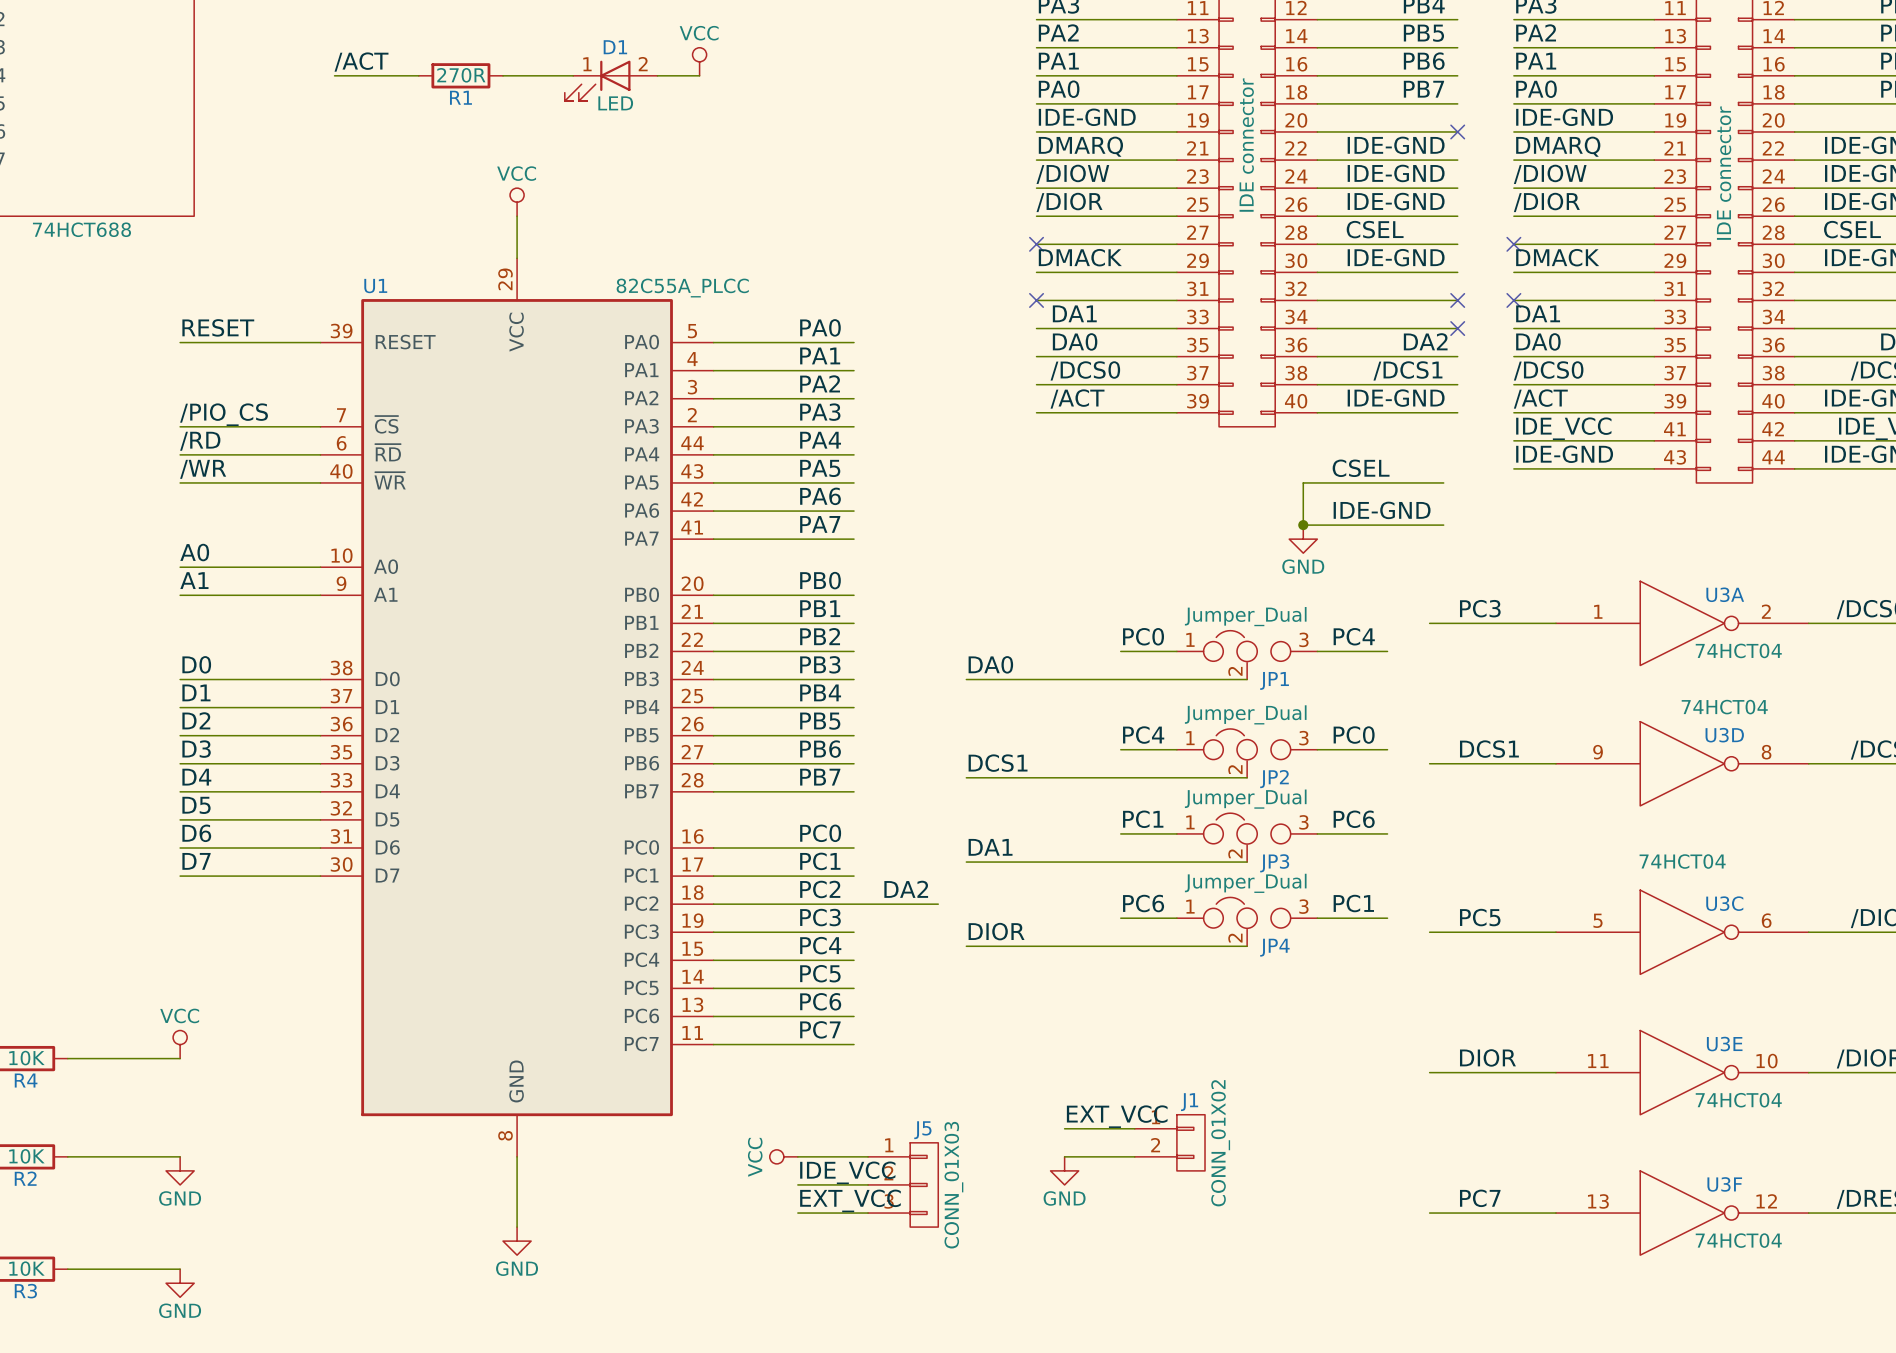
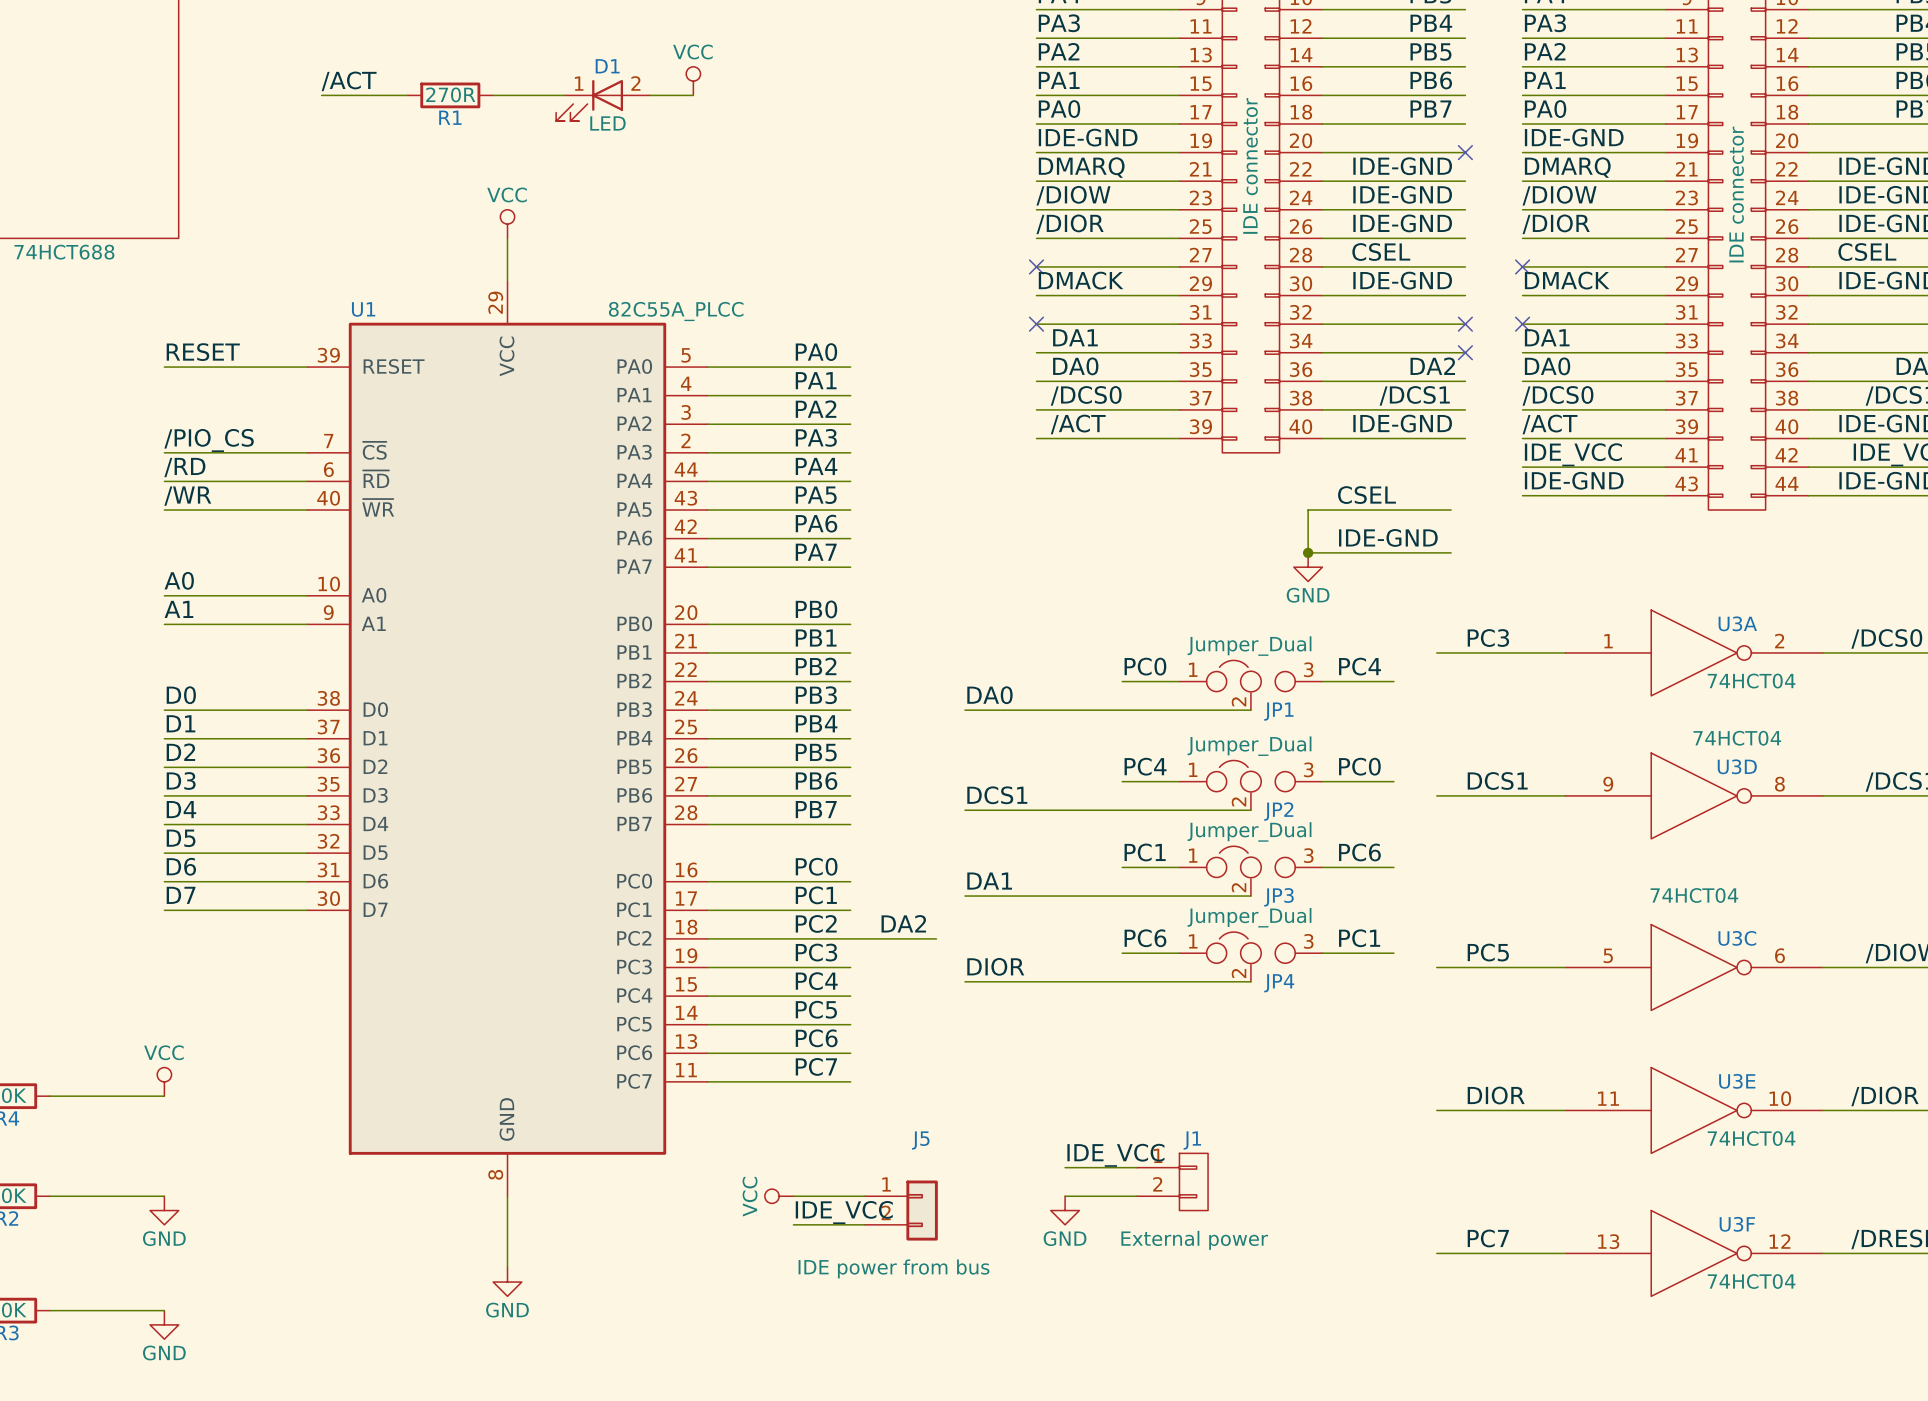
label: EXT_VCC (1117, 1116) -> IDE_VCC (1115, 1155)
J5 symbol: [868, 1142, 939, 1228] -> [864, 1180, 938, 1241]
J1 value: CONN_01X02 (1220, 1143) -> External power (1194, 1240)
J5 value: CONN_01X03 (953, 1185) -> IDE power from bus (894, 1268)
label: EXT_VCC (850, 1200) -> none
wire: (797, 1213) (868, 1213) -> none

